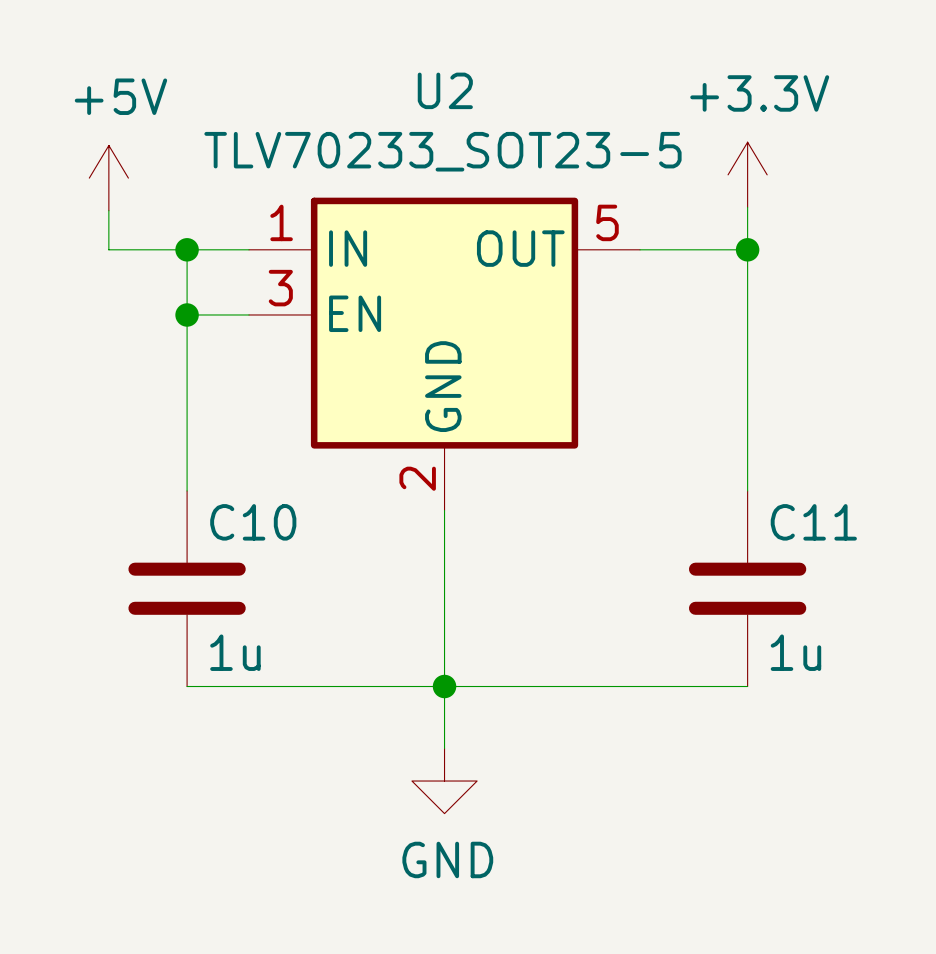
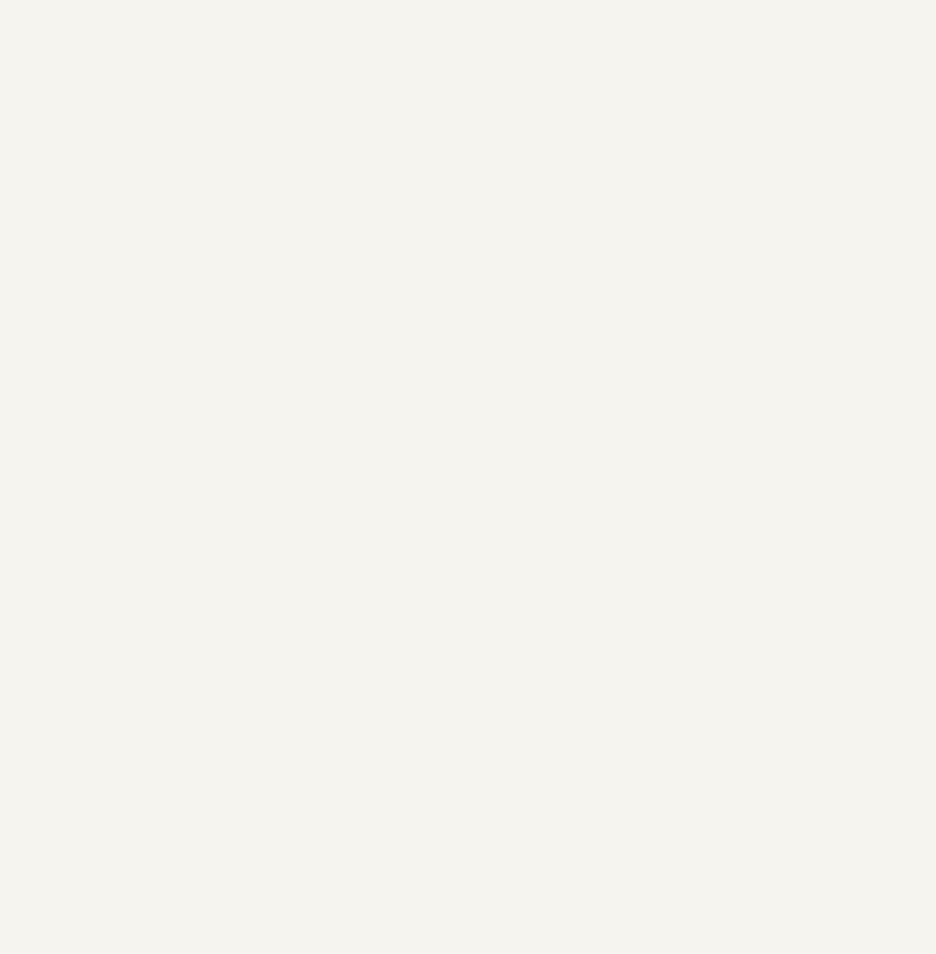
power symbol: +3.3V (747, 174) -> none
power symbol: +5V (108, 178) -> none
wire: (747, 207) (747, 490) -> none
wire: (108, 210) (108, 249) (248, 249) -> none
wire: (187, 249) (187, 490) -> none
junction: (187, 249) -> none
wire: (640, 249) (747, 249) -> none
junction: (747, 249) -> none
wire: (187, 314) (248, 314) -> none
junction: (187, 314) -> none
U2: TLV70233_SOT23-5 (444, 354) -> none
wire: (444, 510) (444, 748) -> none
C10: 1u (187, 588) -> none
C11: 1u (747, 588) -> none
wire: (187, 686) (747, 686) -> none
junction: (444, 686) -> none
power symbol: GND (444, 781) -> none

